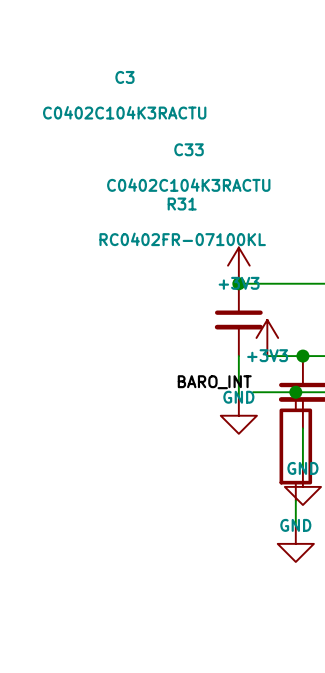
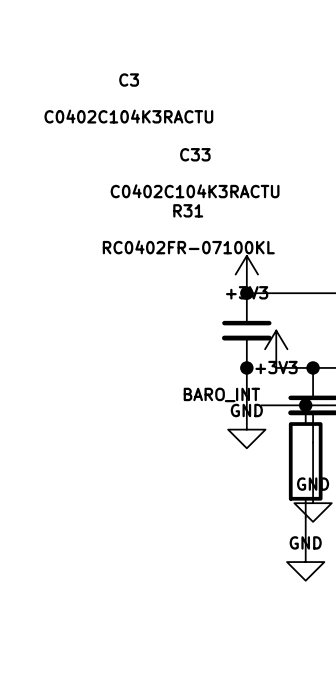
junction: none -> (246, 367)

